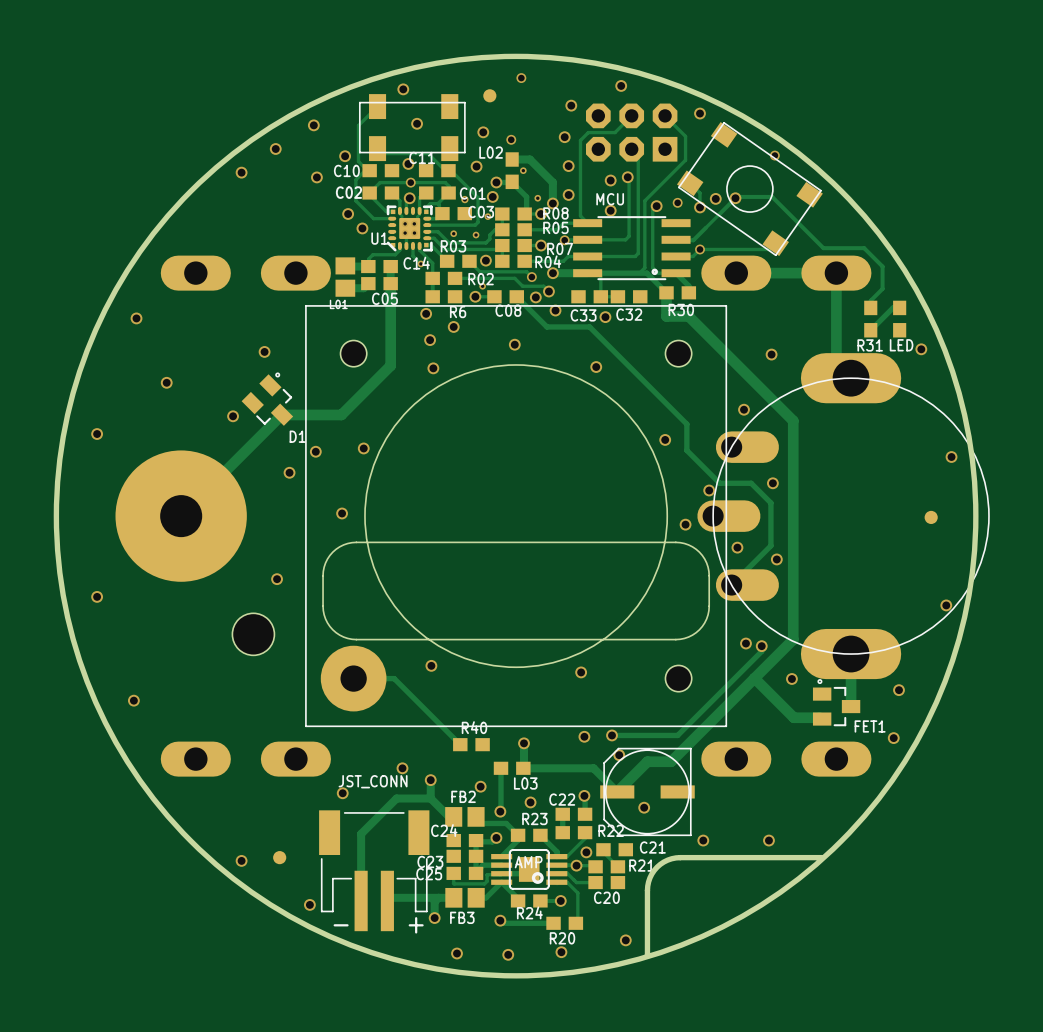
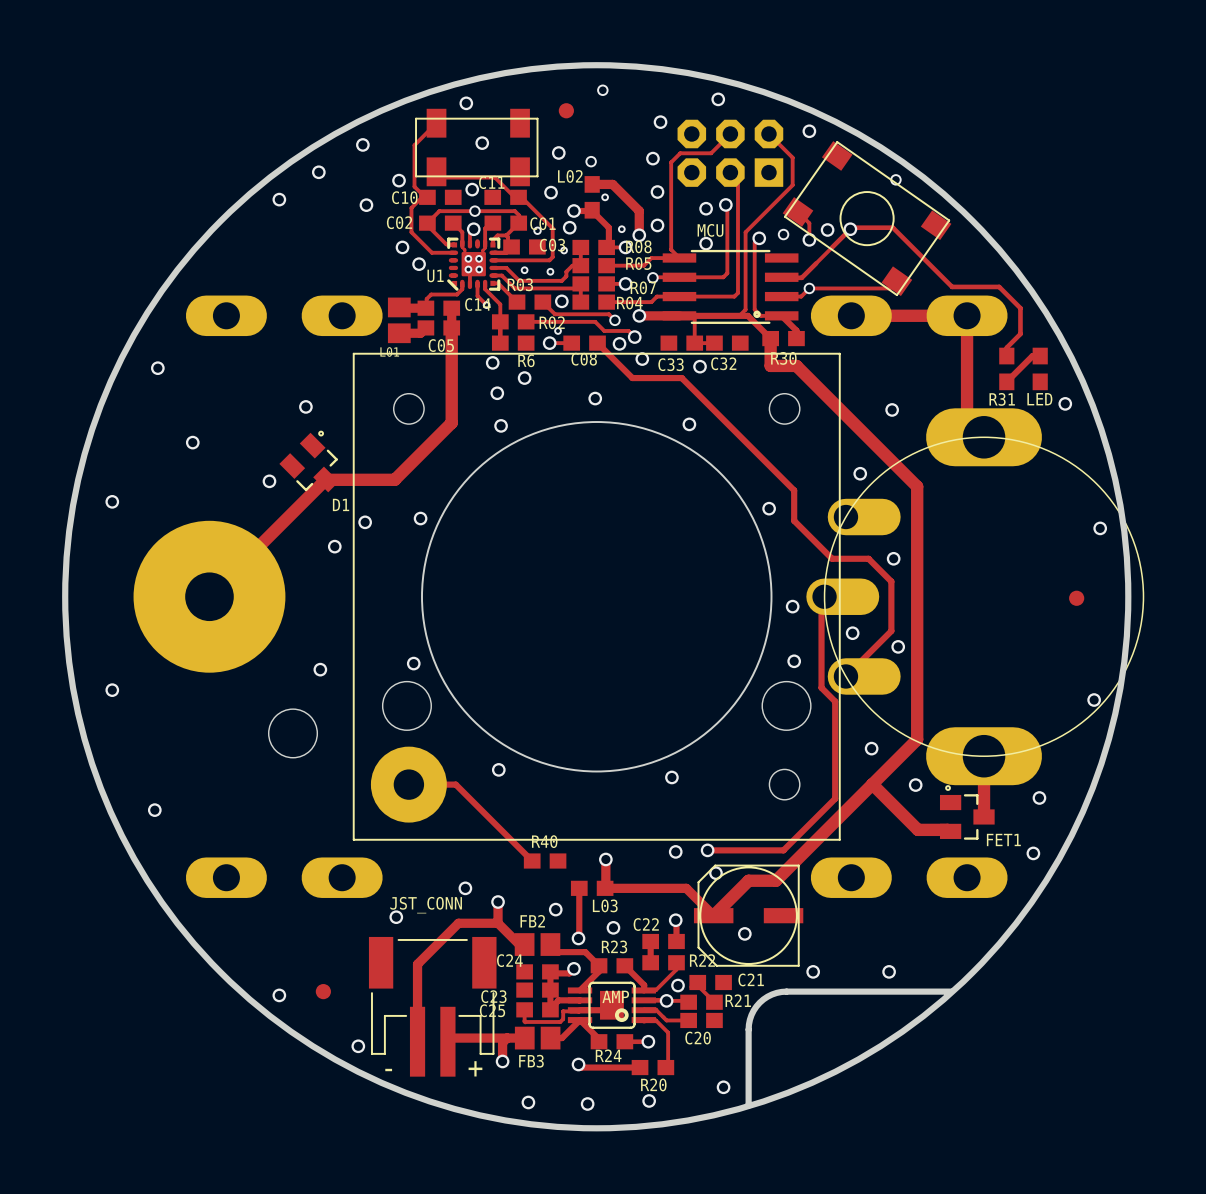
part footprint: [305, 305, 728, 728] -> [352, 352, 841, 841]
via: (709, 490) -> none
via position: (342, 513) -> (413, 663)
via: none -> (794, 661)
via: (745, 643) -> none
track: (761, 646) (761, 651) (722, 690) -> (824, 596) (821, 599) (821, 687) (835, 701) (835, 798)
via: (761, 646) -> none
via: none -> (871, 748)

